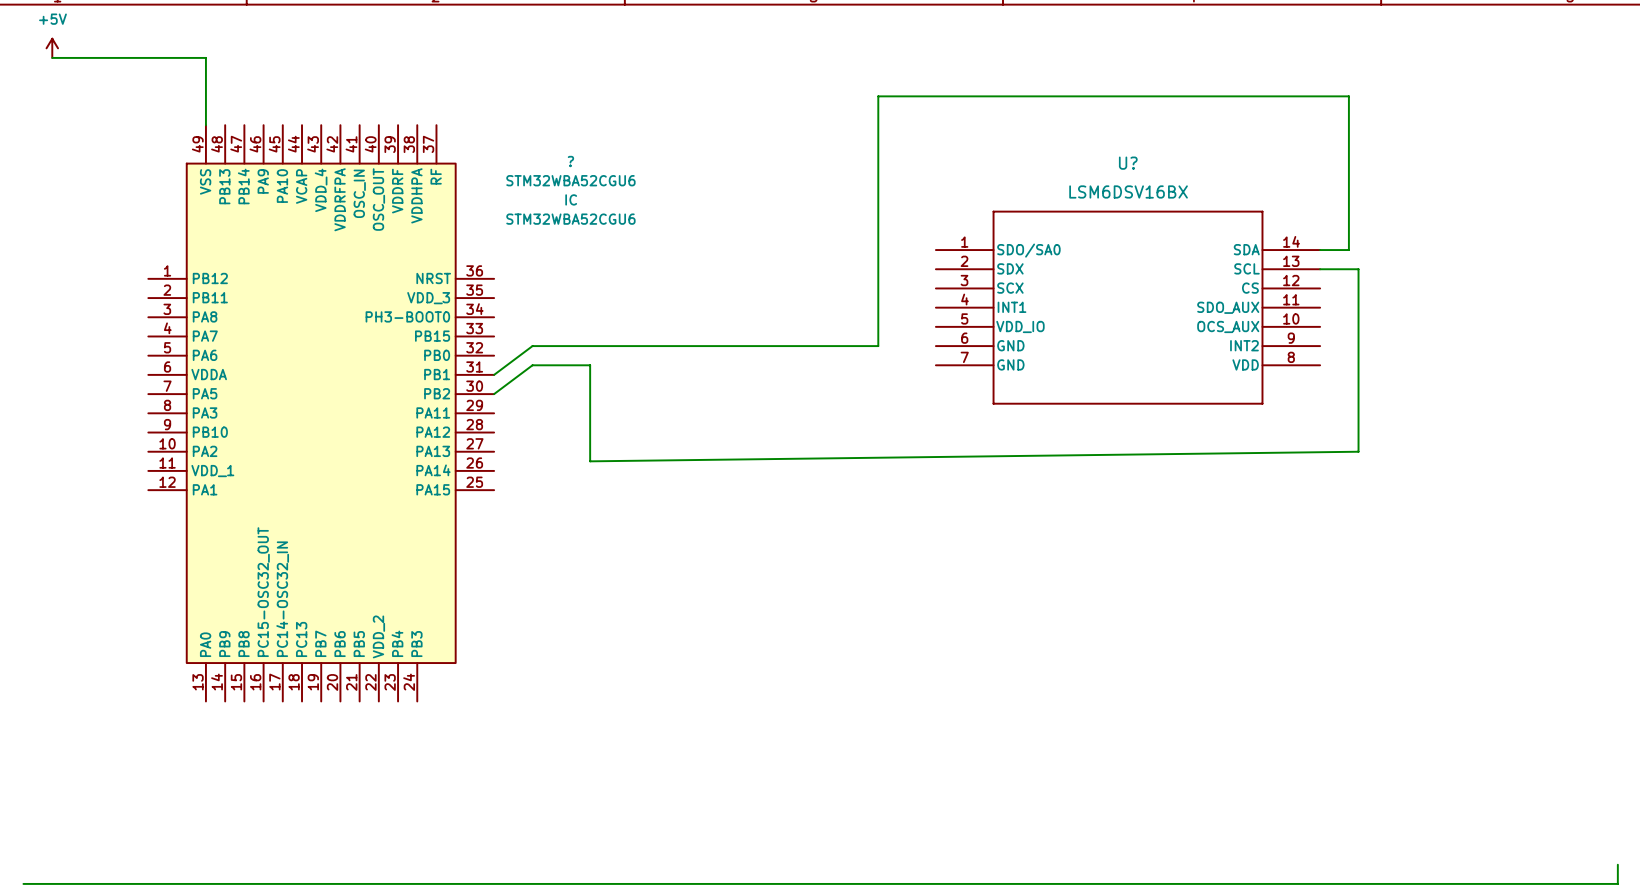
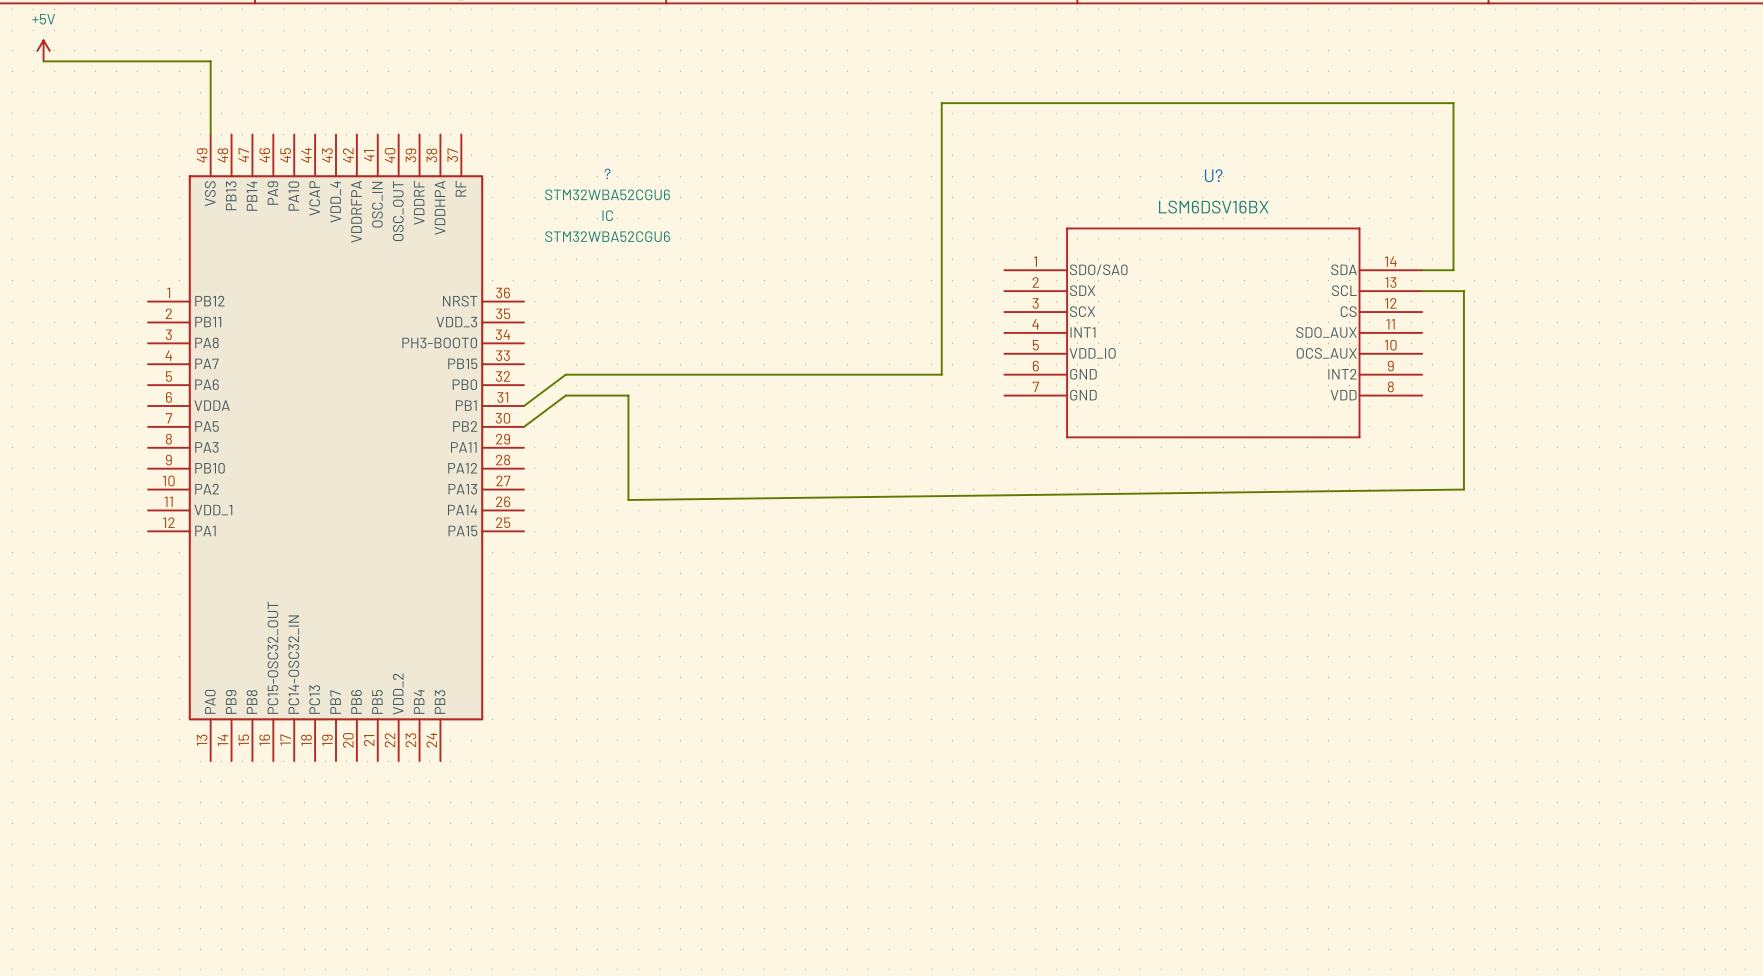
wire: (1617, 864) (1617, 883) (23, 883) -> none

